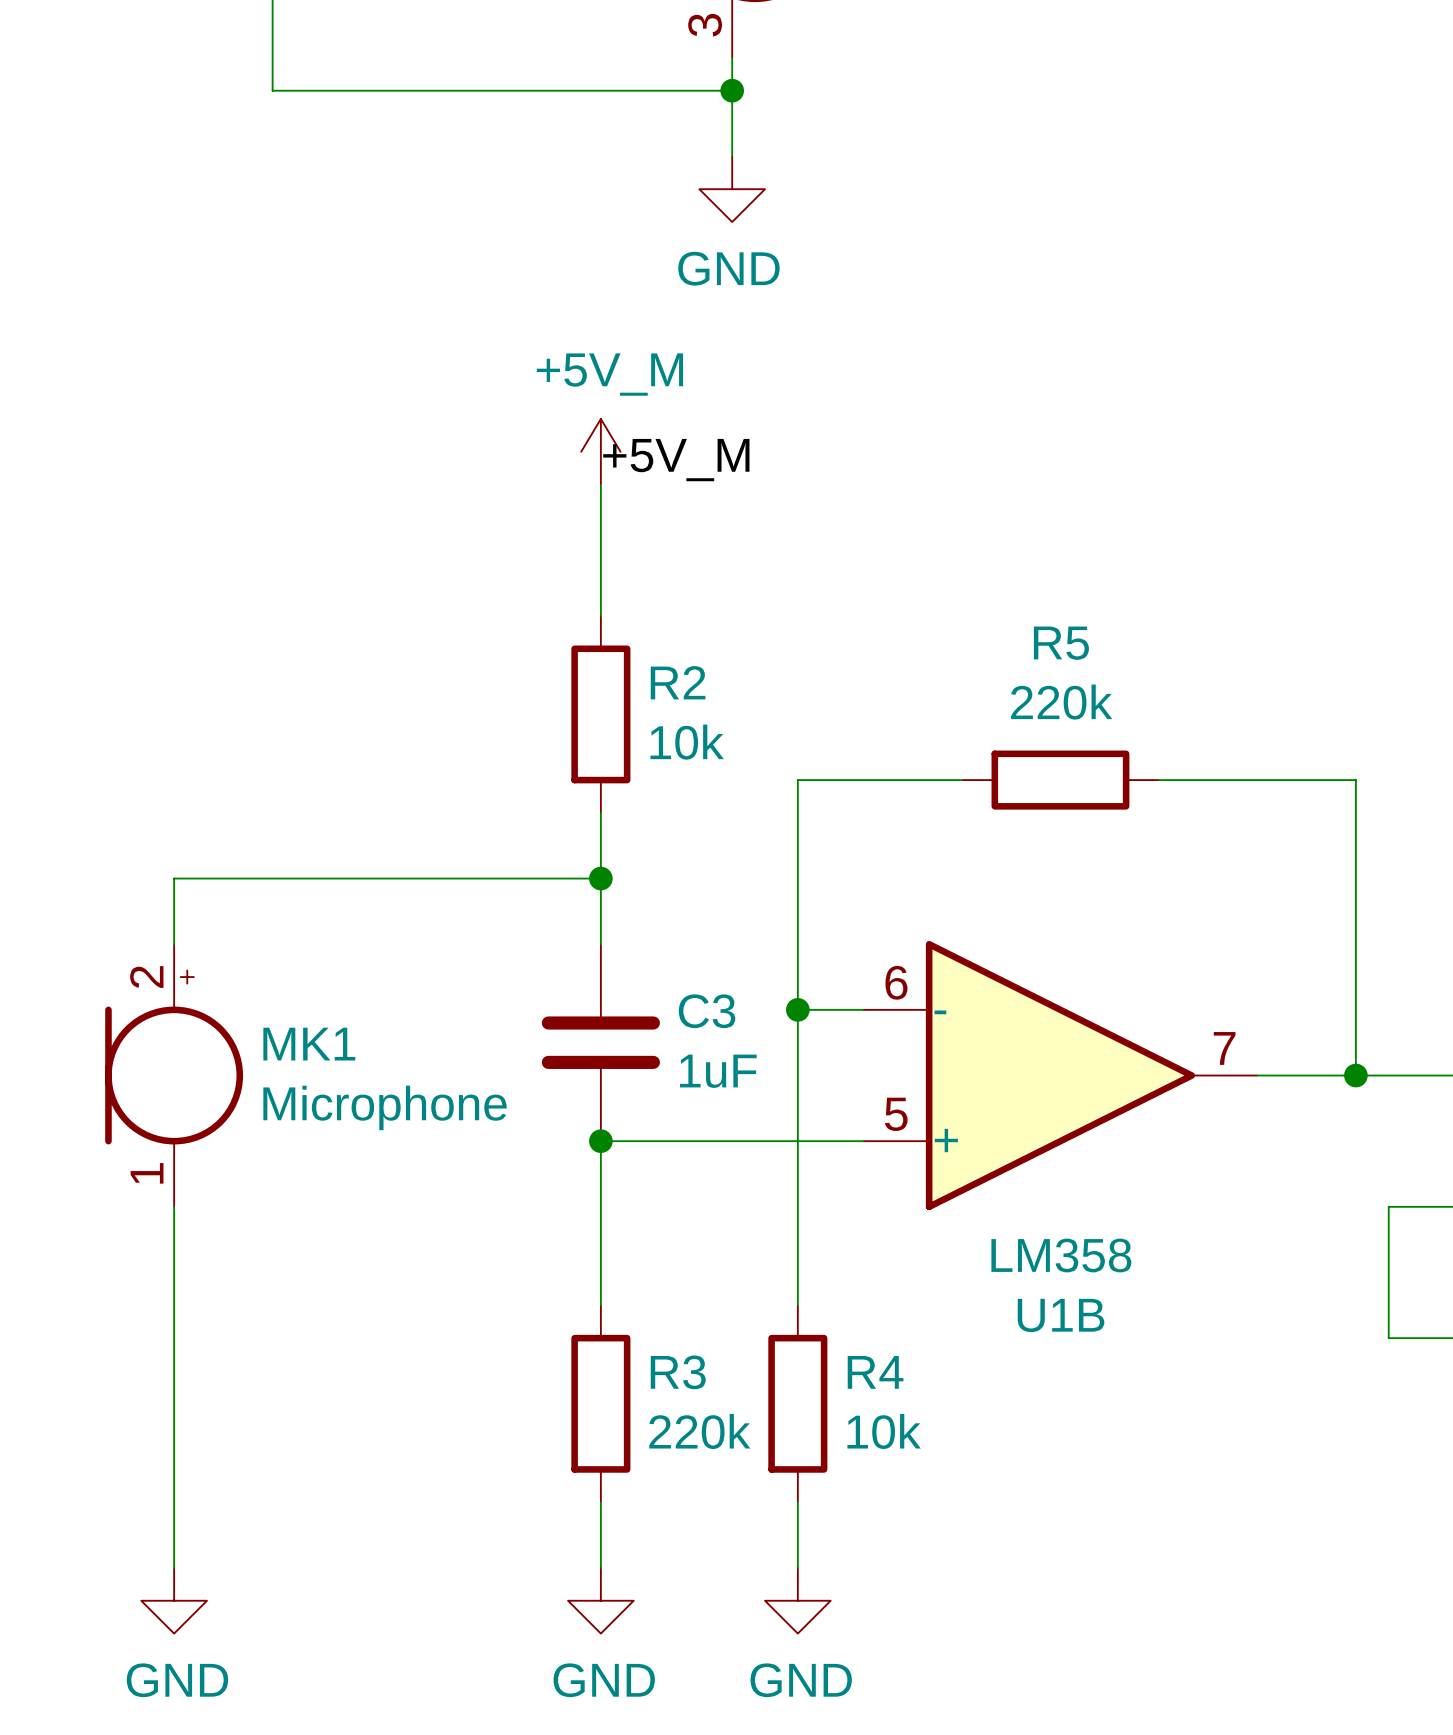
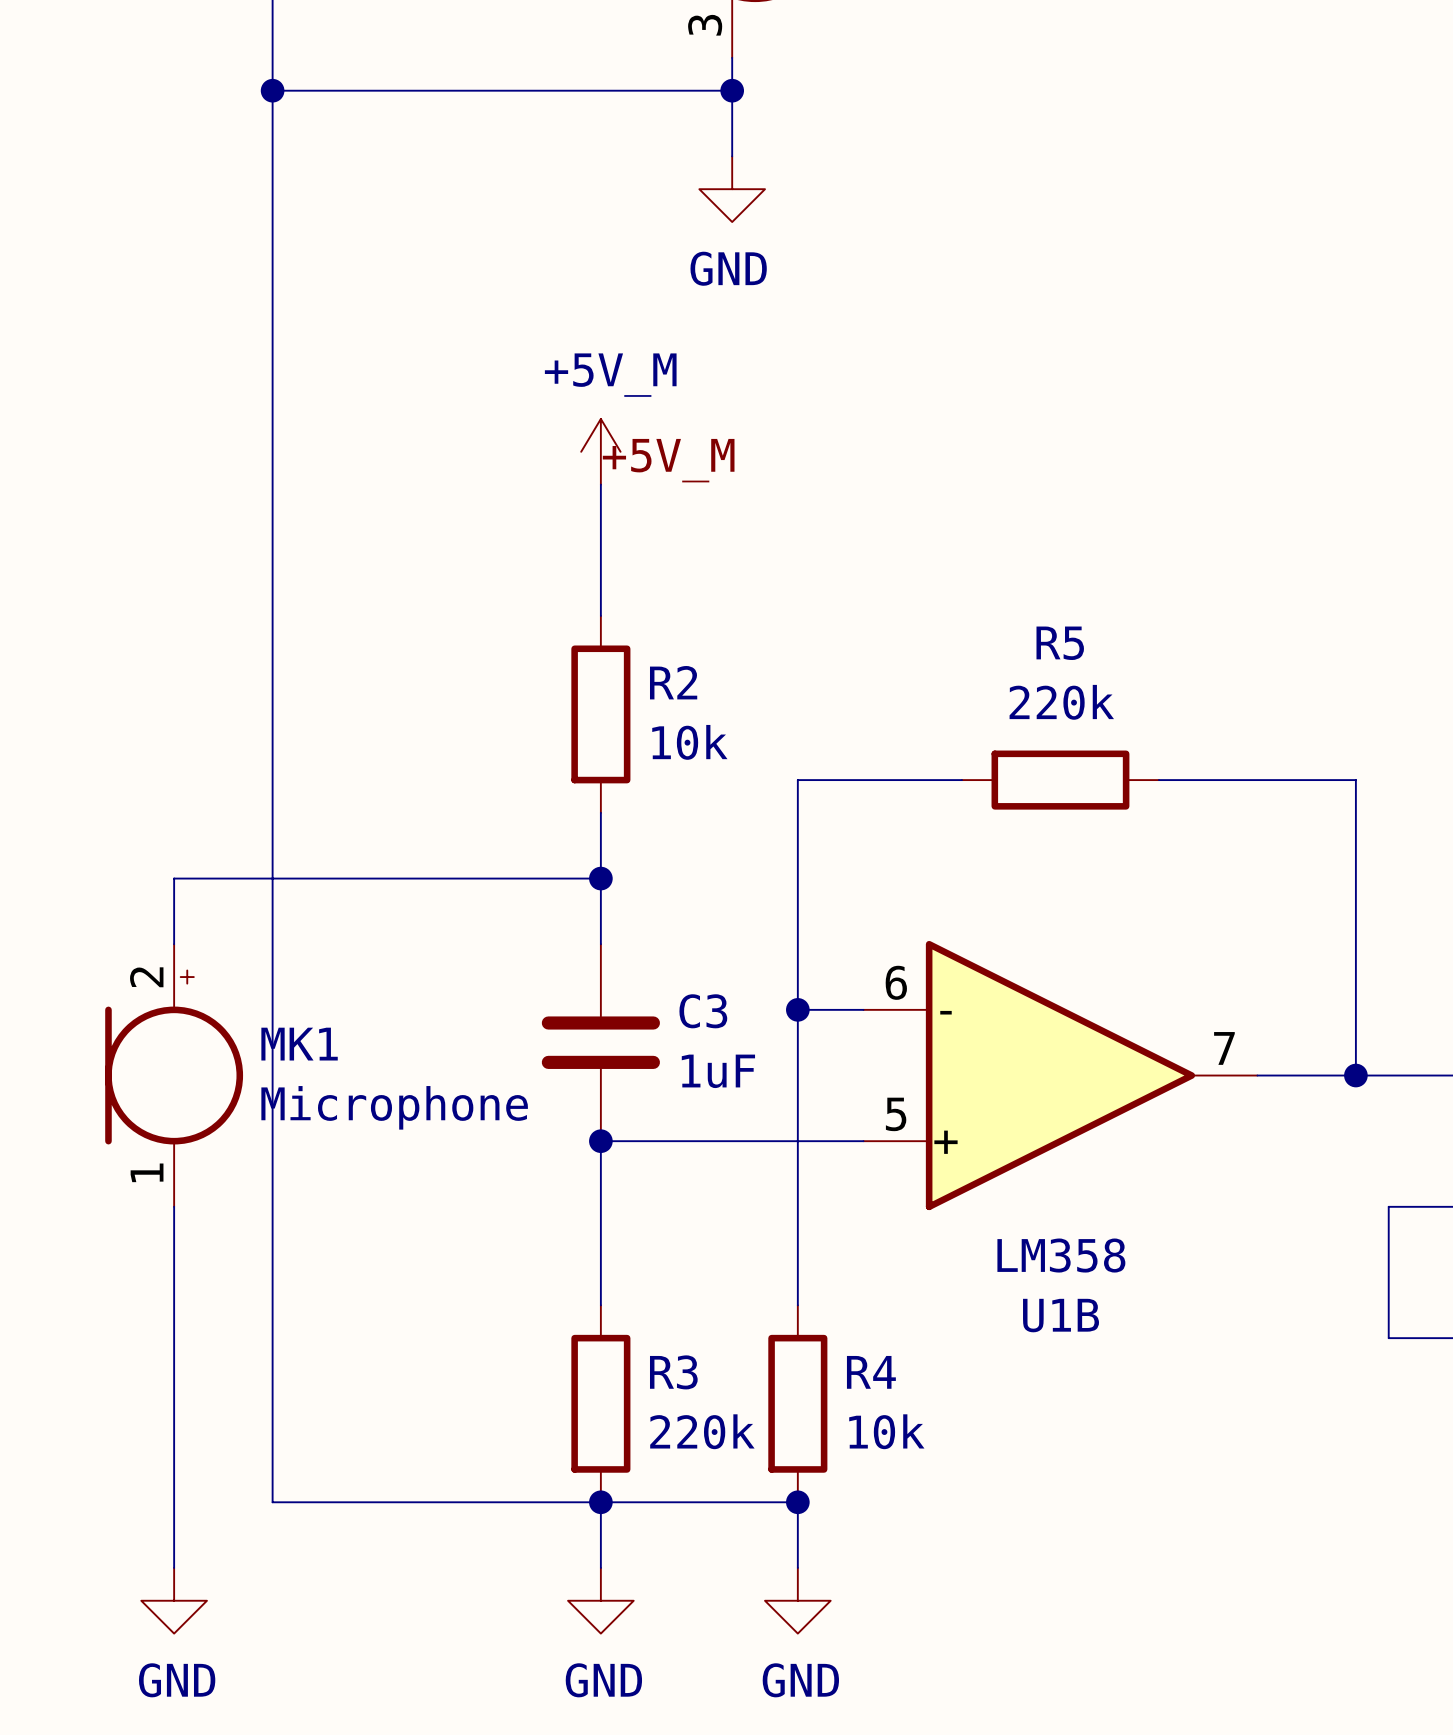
wire: none -> (272, 90) (272, 1502) (797, 1502)
junction: none -> (272, 90)
junction: none -> (600, 1502)
junction: none -> (797, 1502)

